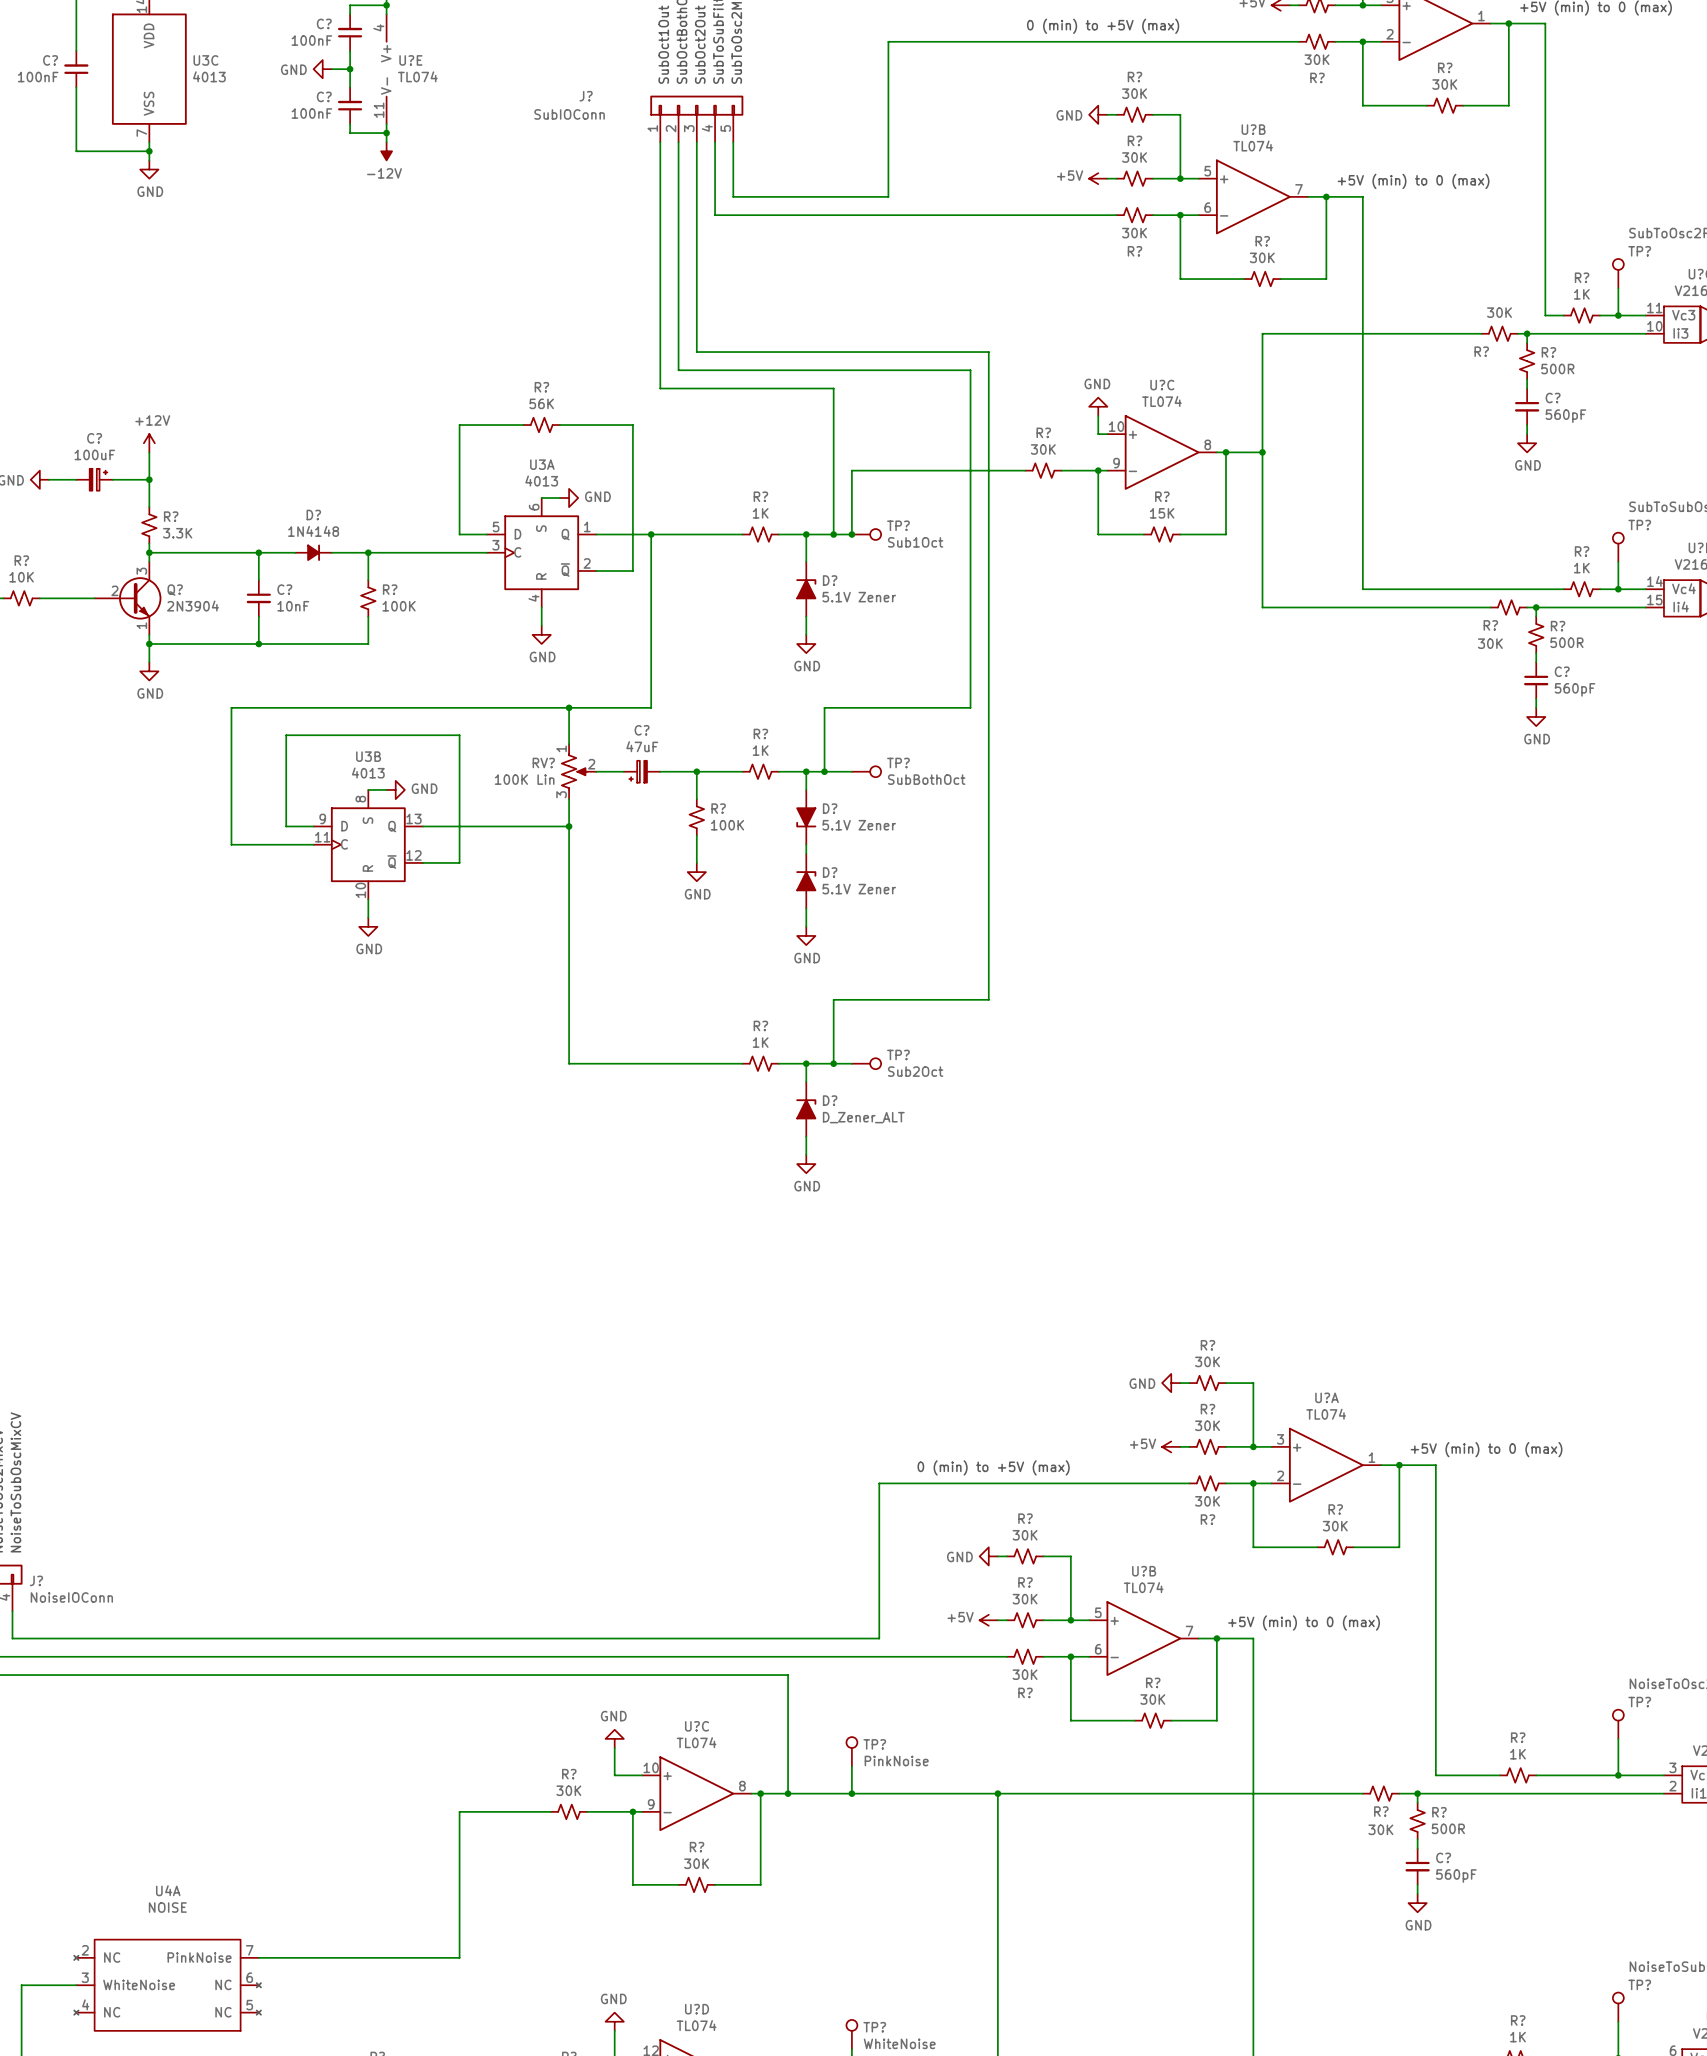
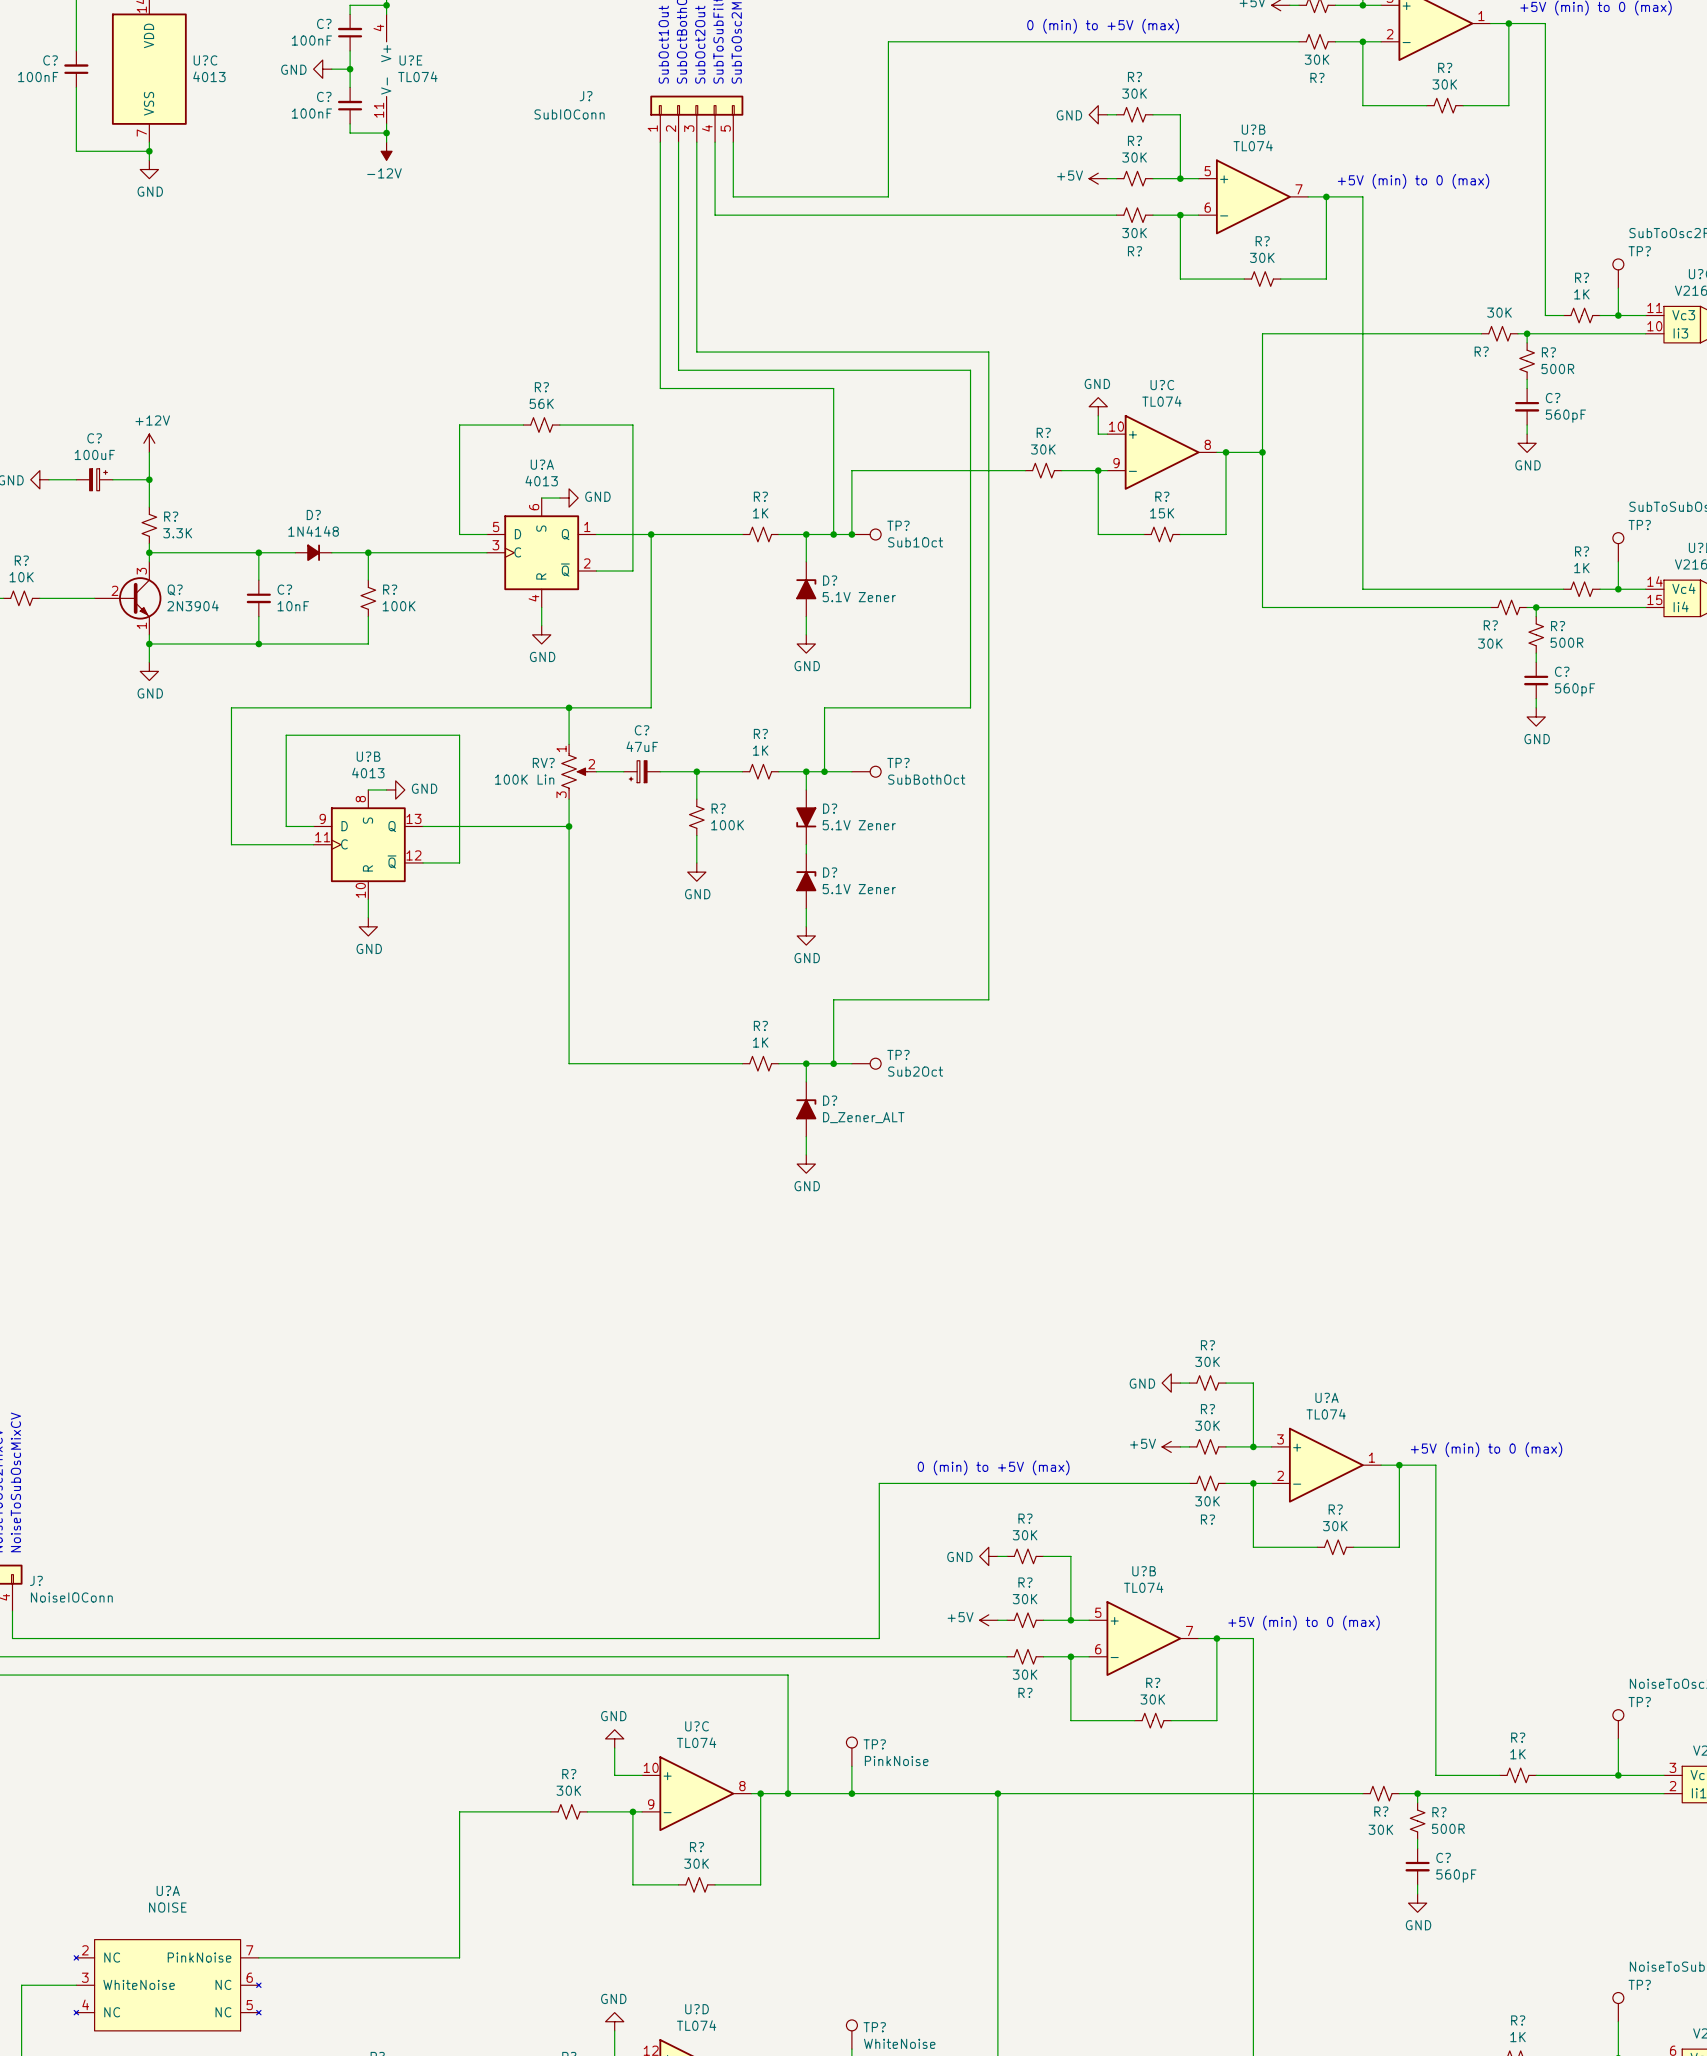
U3C name: U3C (205, 60) -> U?C (205, 60)
U3A name: U3A (542, 464) -> U?A (542, 464)
U3B name: U3B (368, 756) -> U?B (368, 756)
U4A name: U4A (168, 1890) -> U?A (168, 1890)

